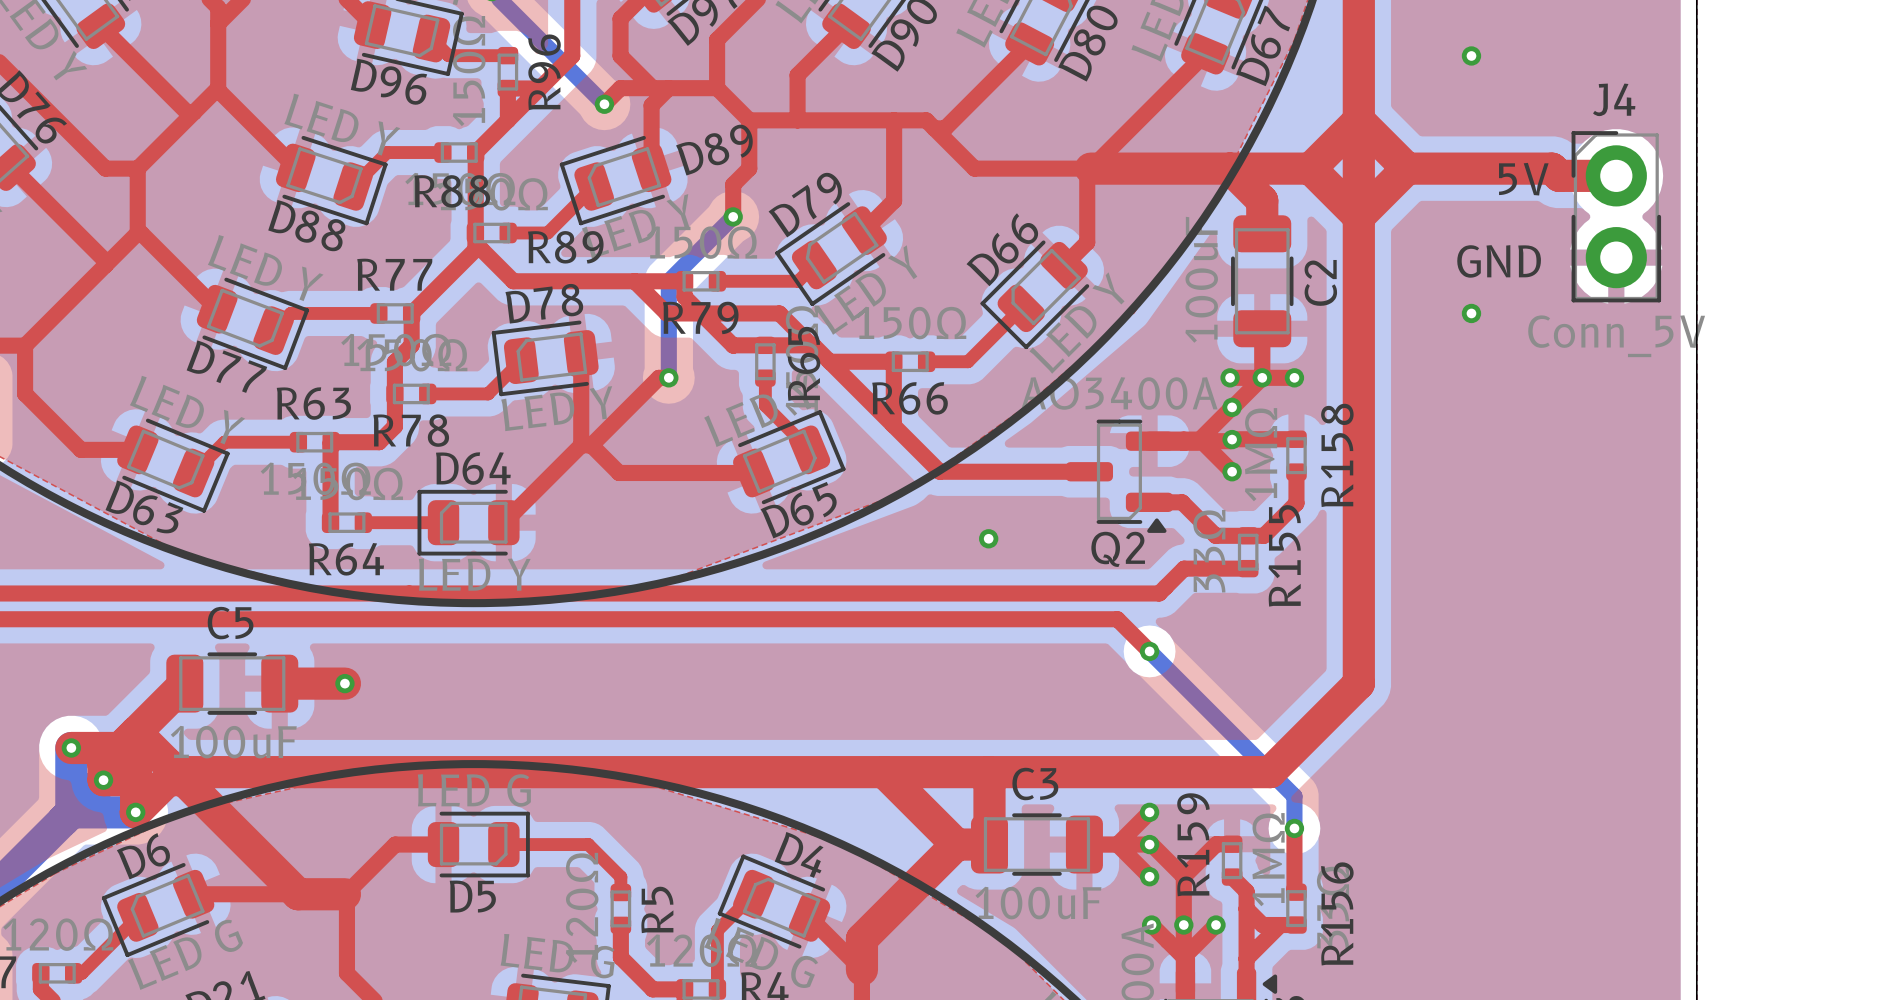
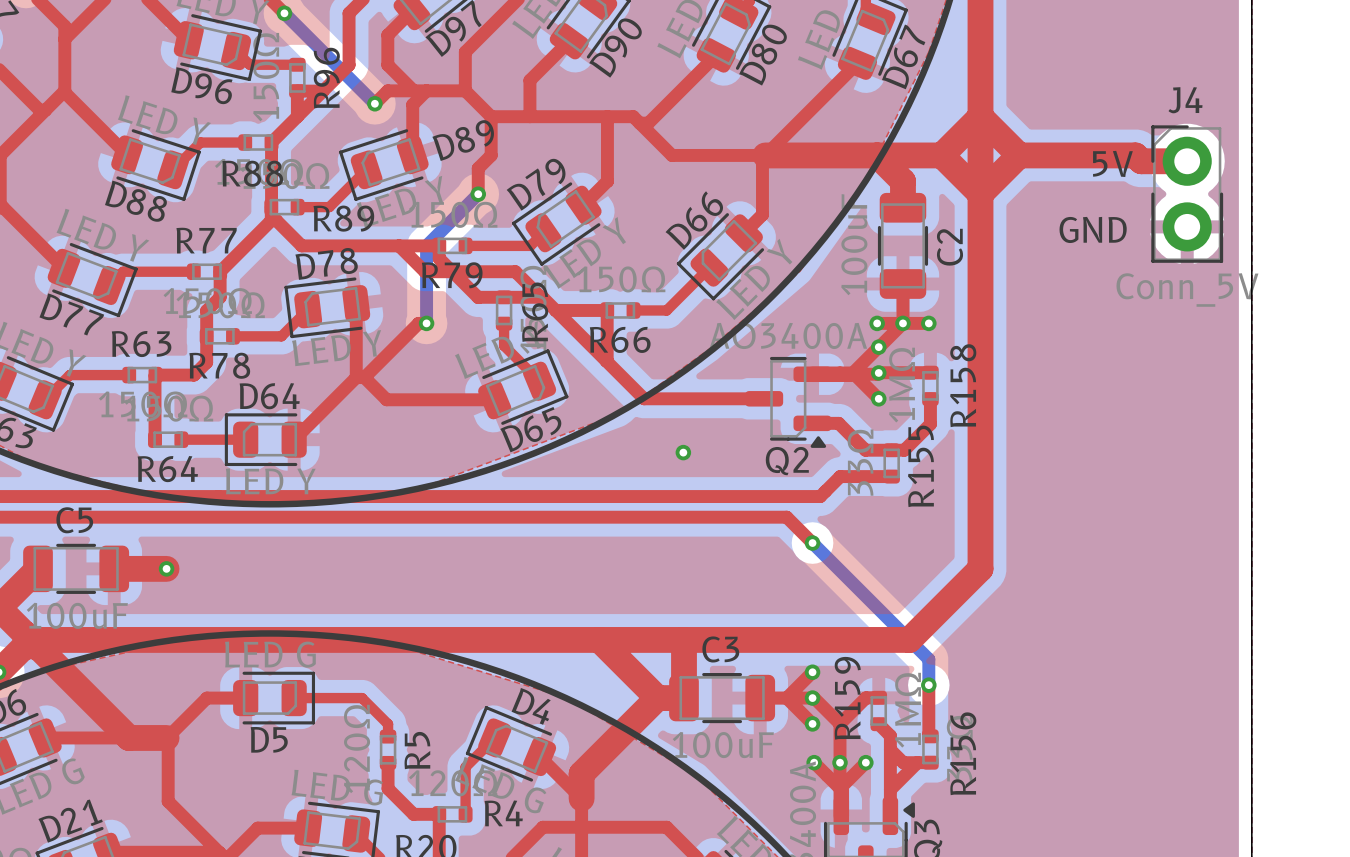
via: (1471, 55) -> none
via: (1471, 313) -> none

